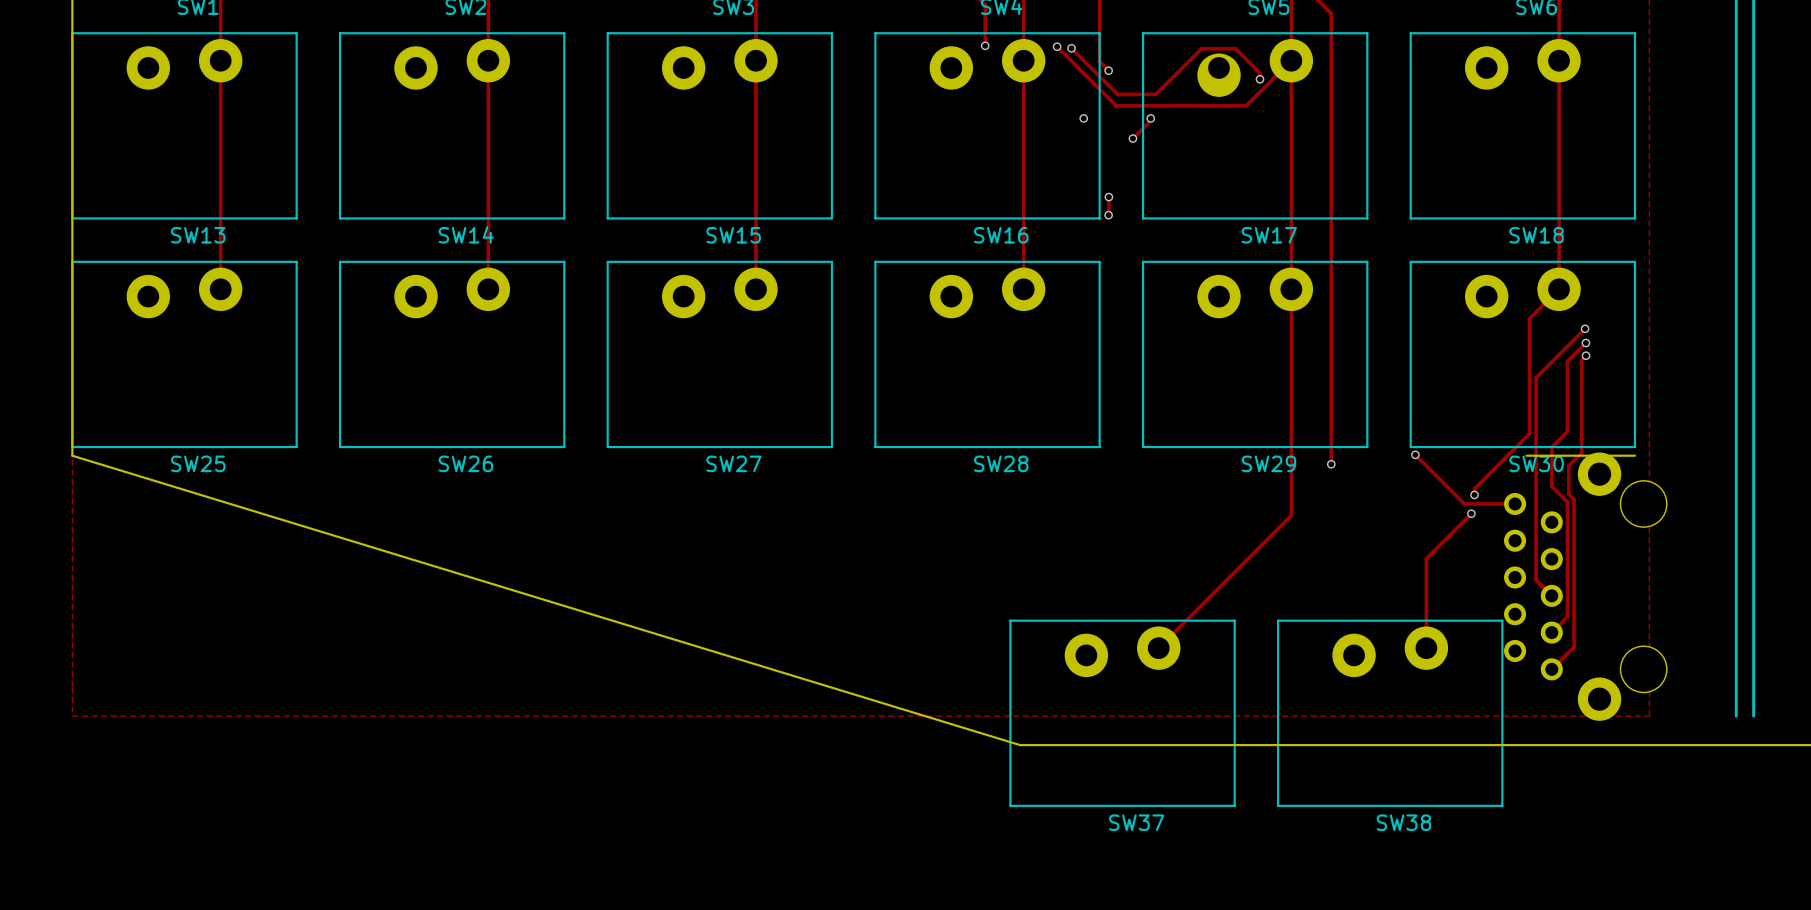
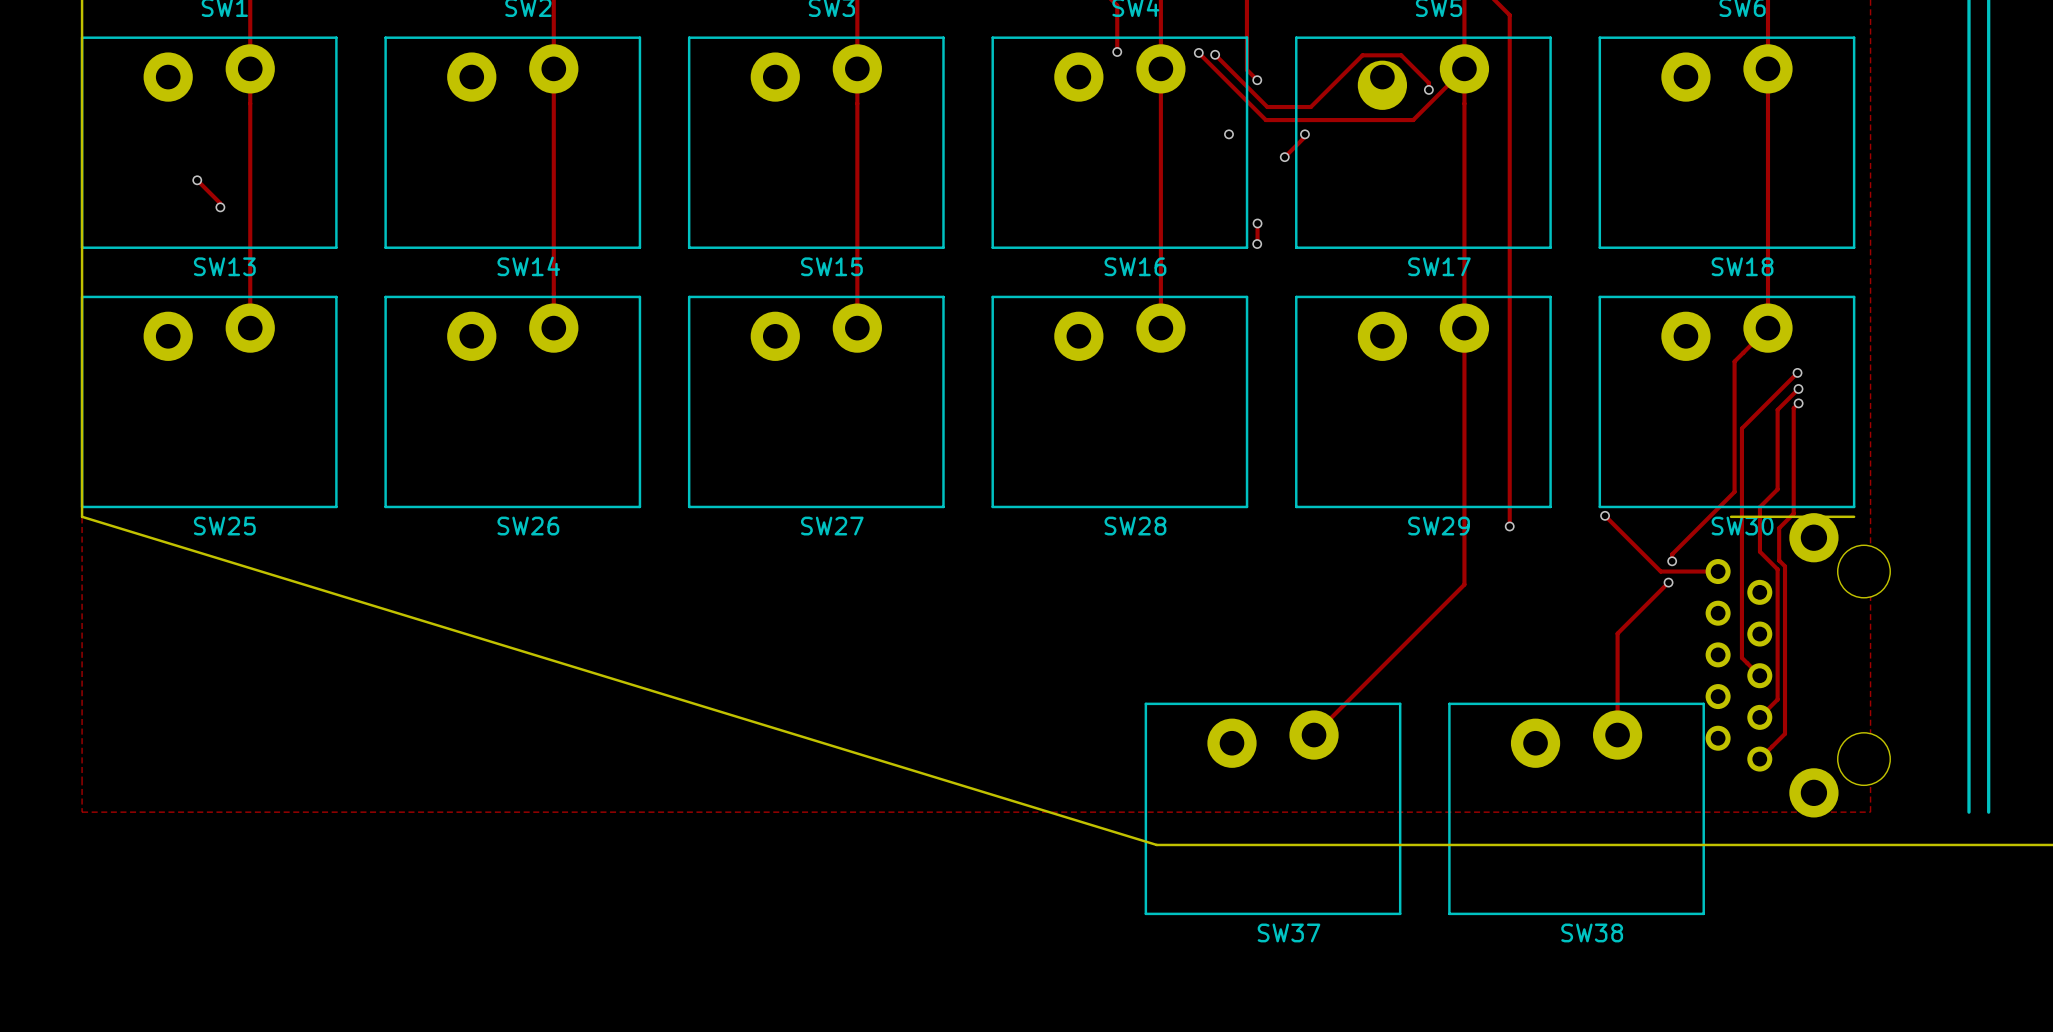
track: none -> (197, 180) (220, 203) (220, 207)
via: none -> (197, 180)
via: none -> (220, 207)

